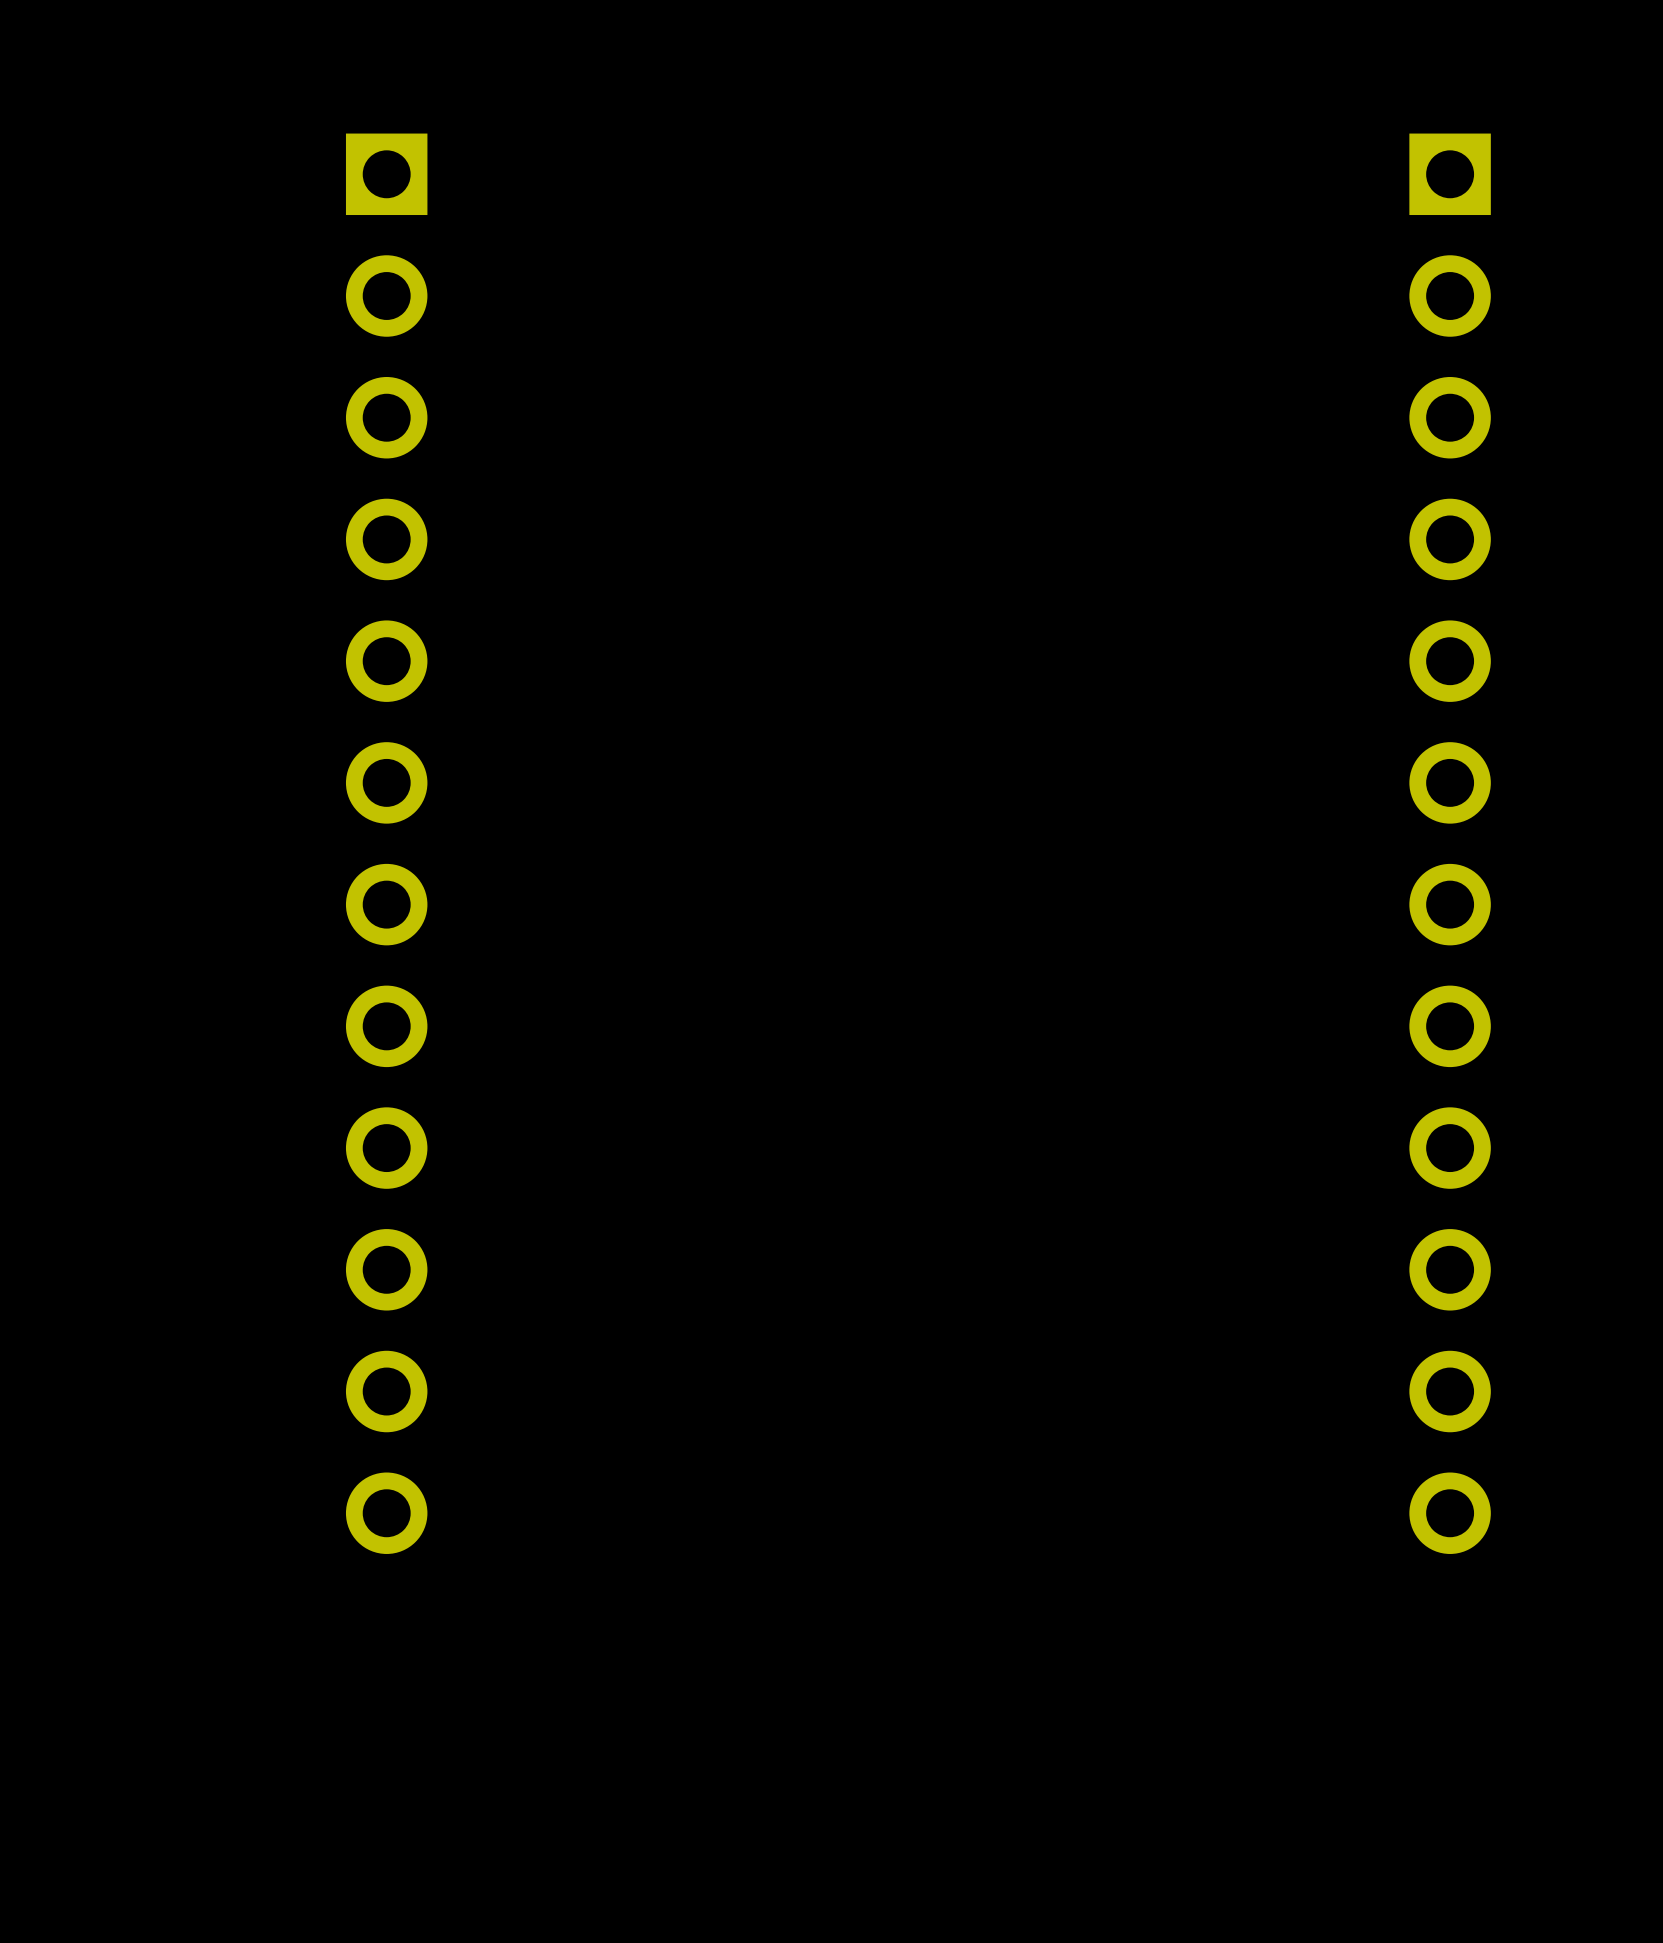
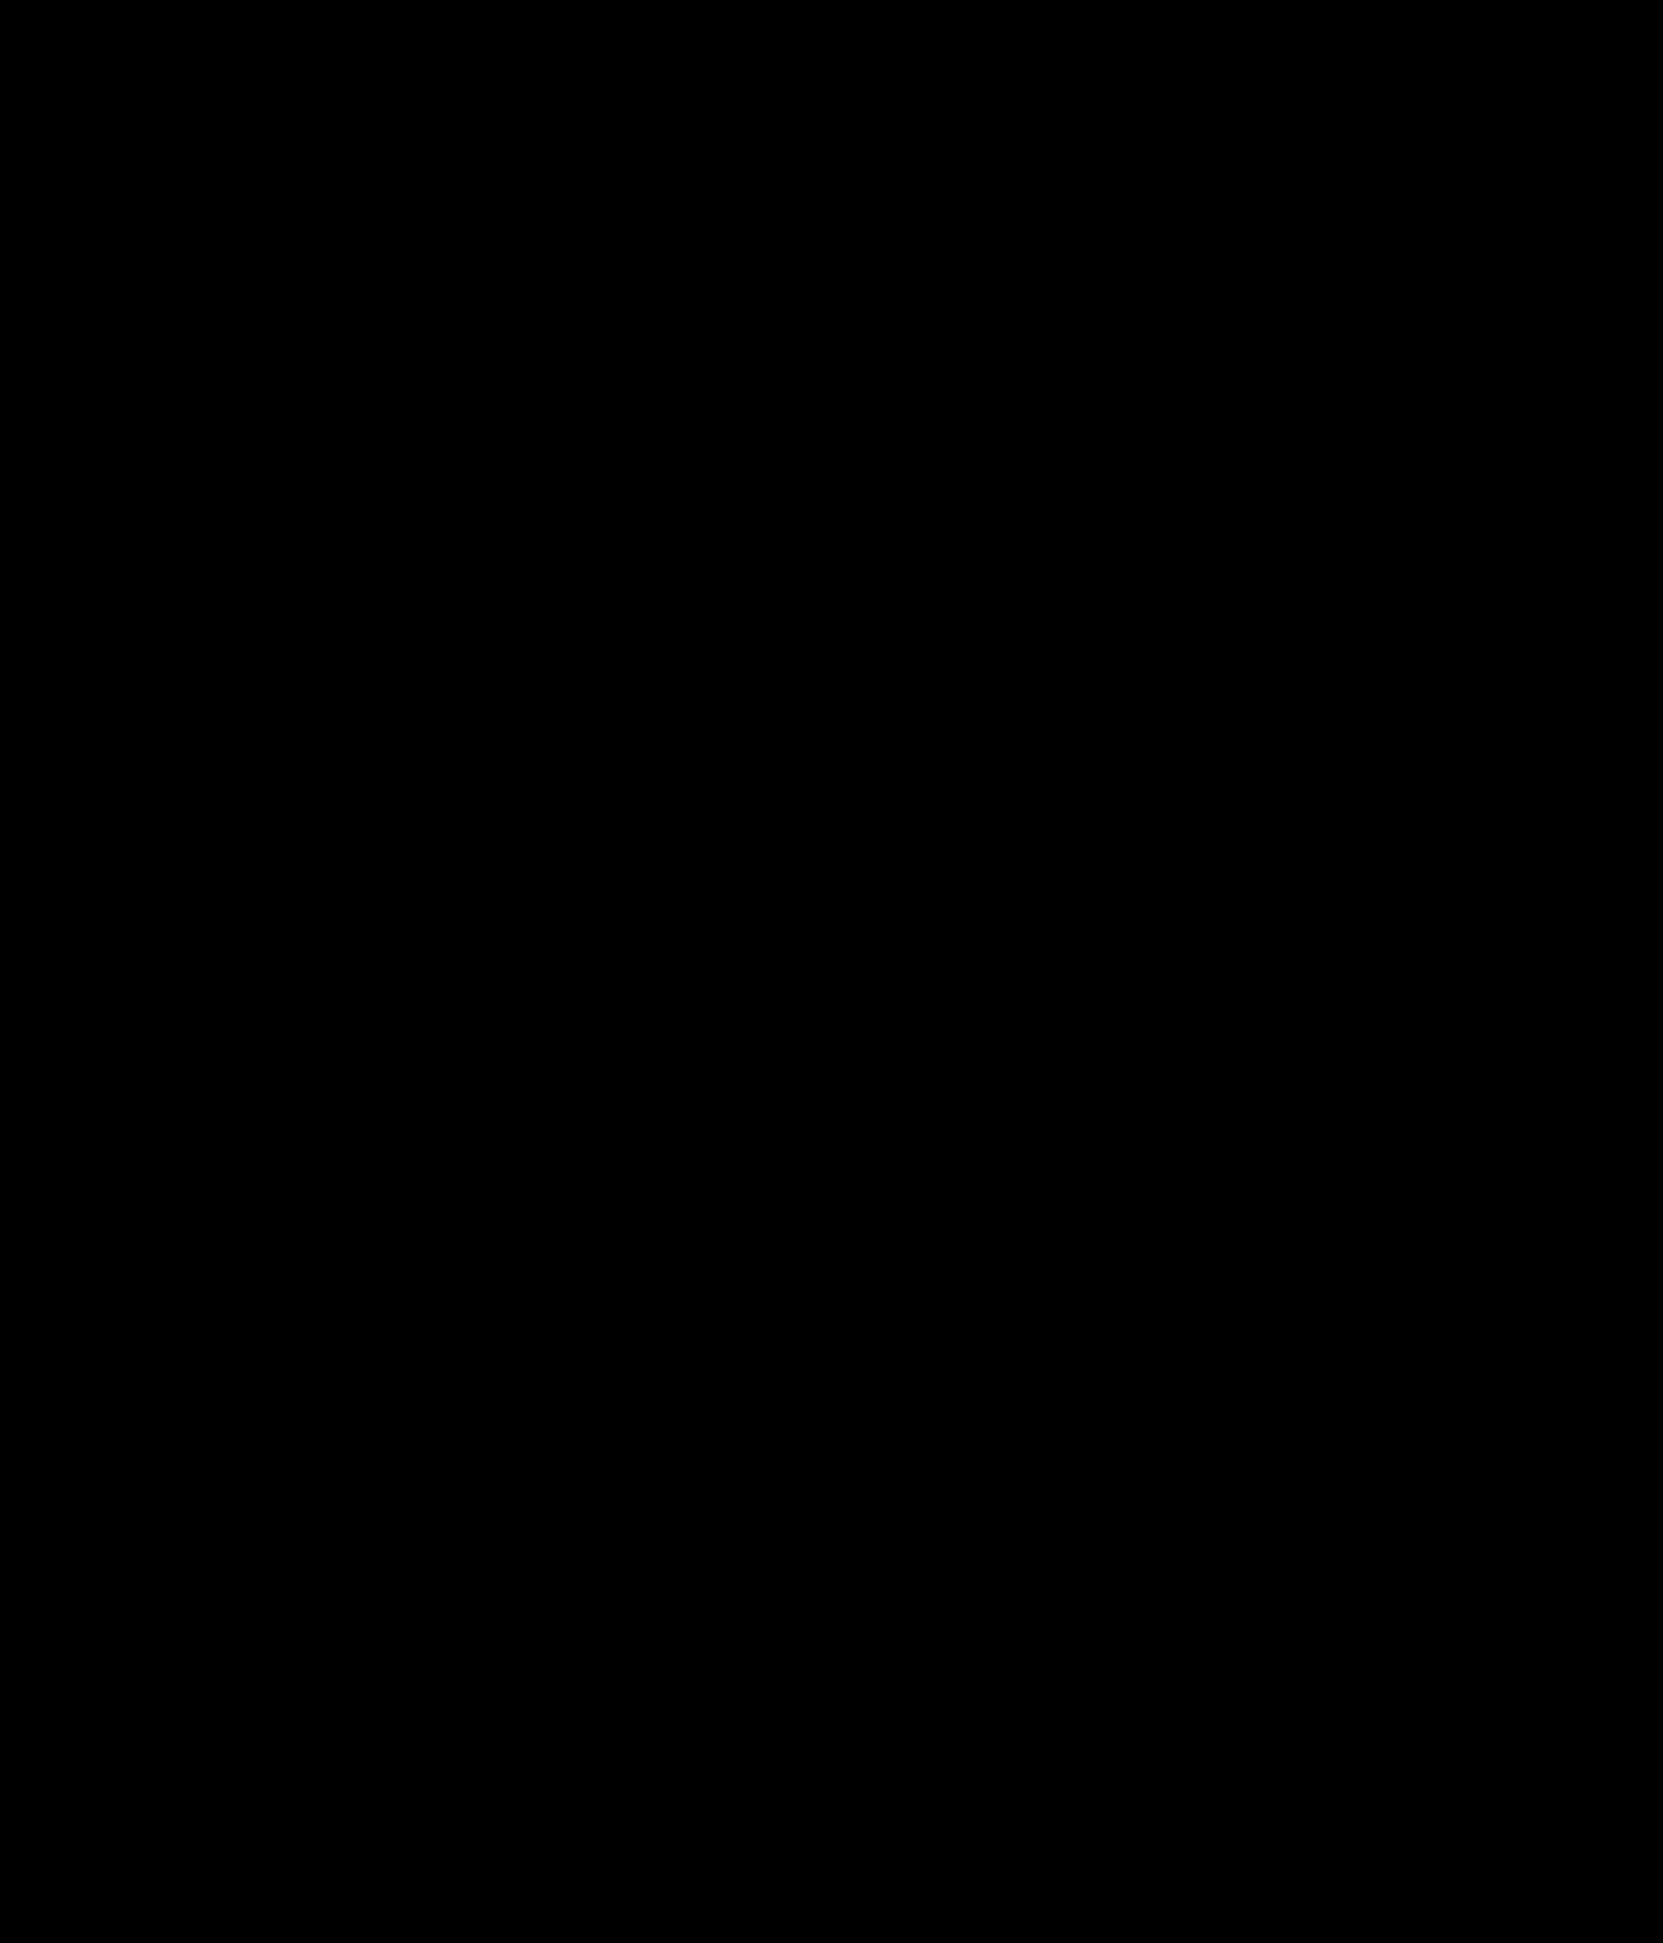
part: (386, 843) -> none
part: (1450, 843) -> none

